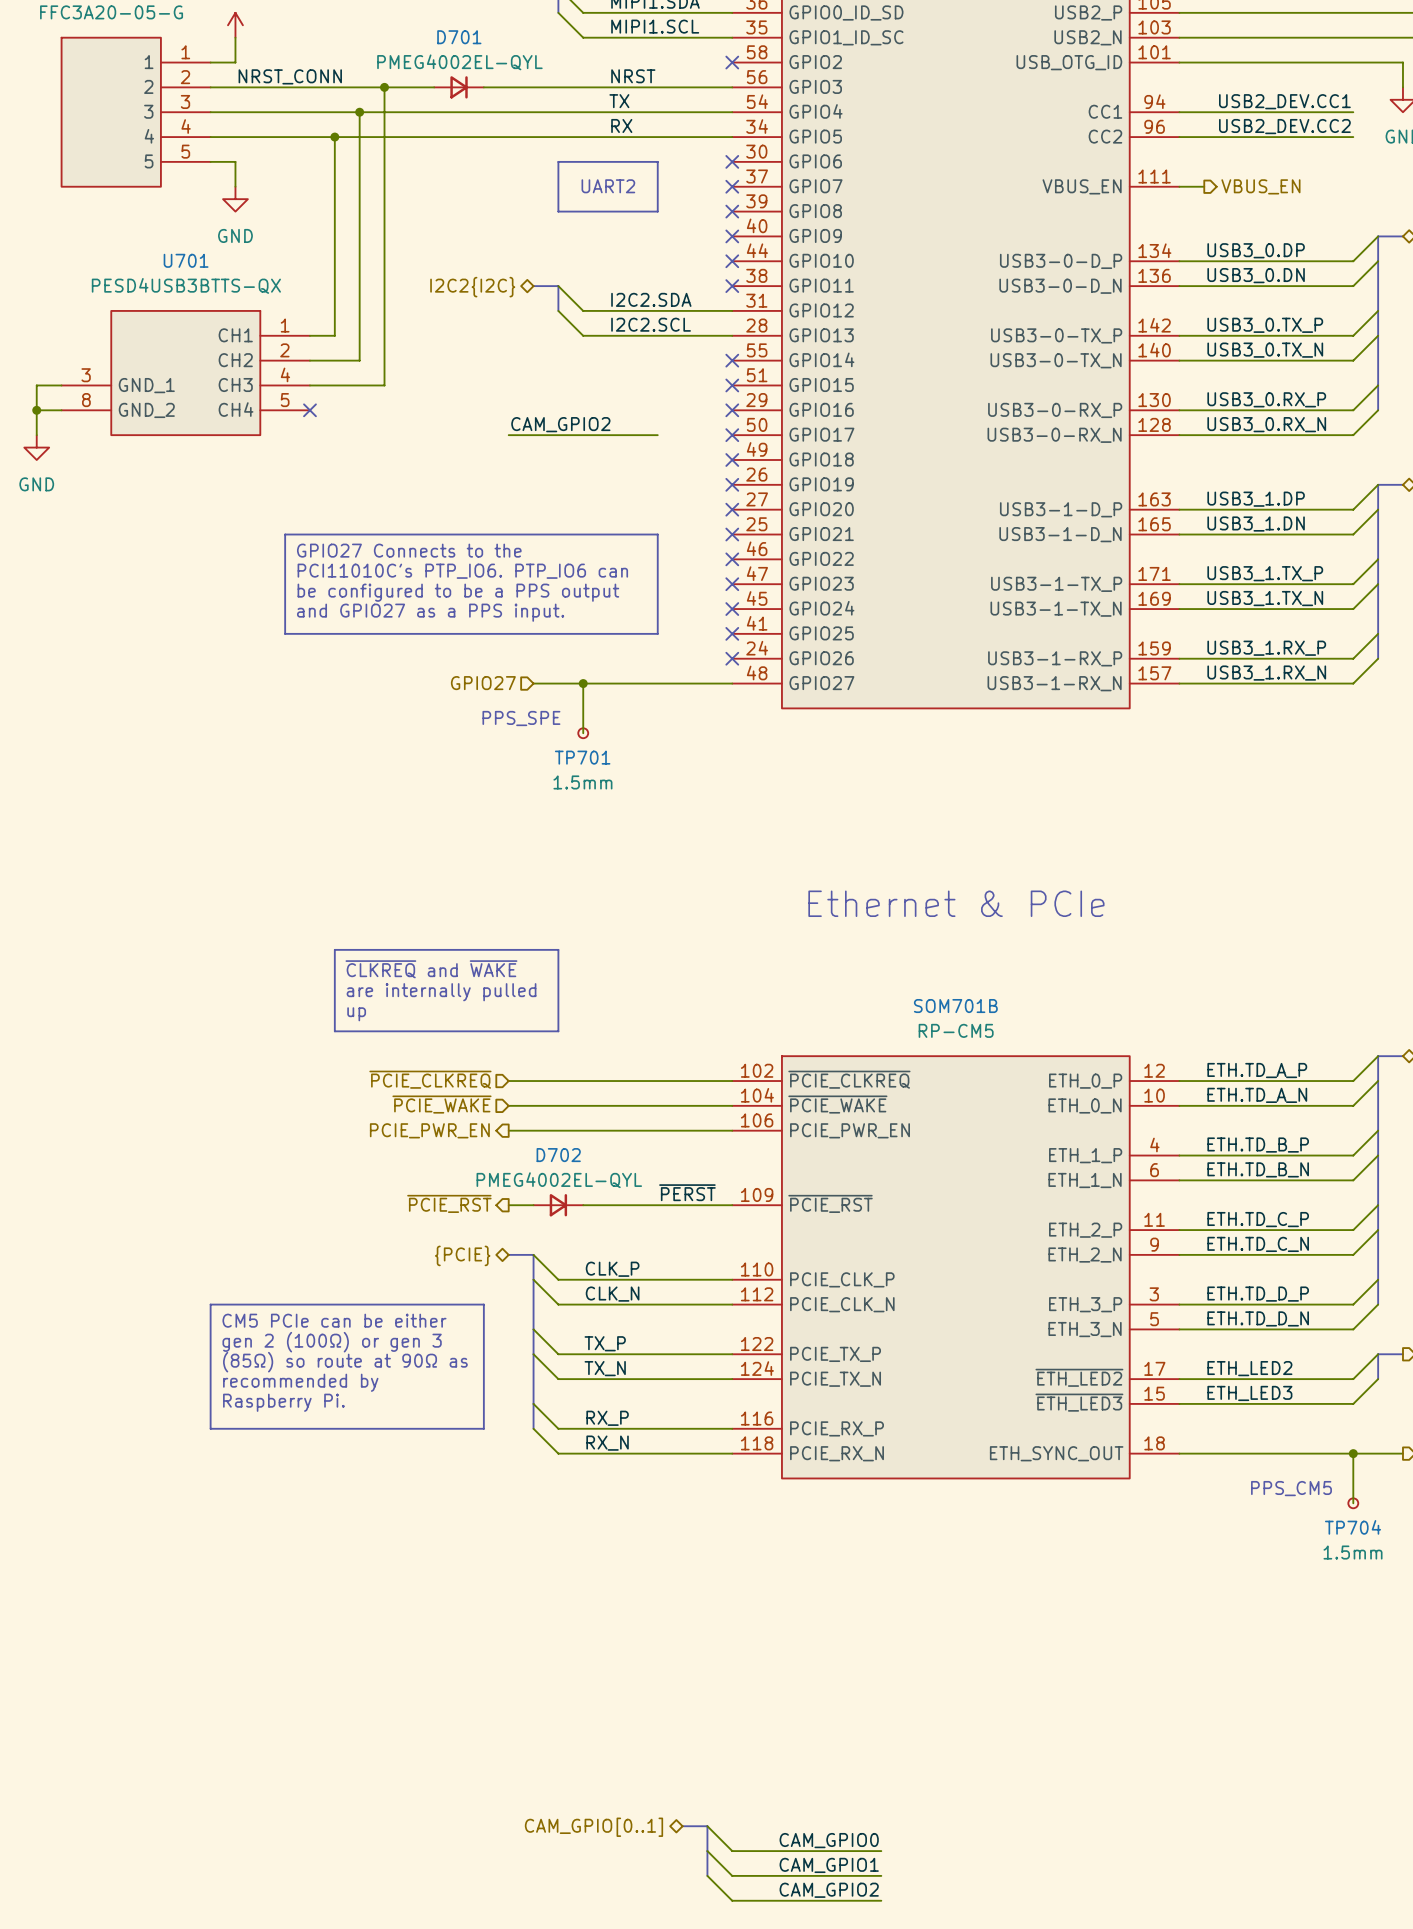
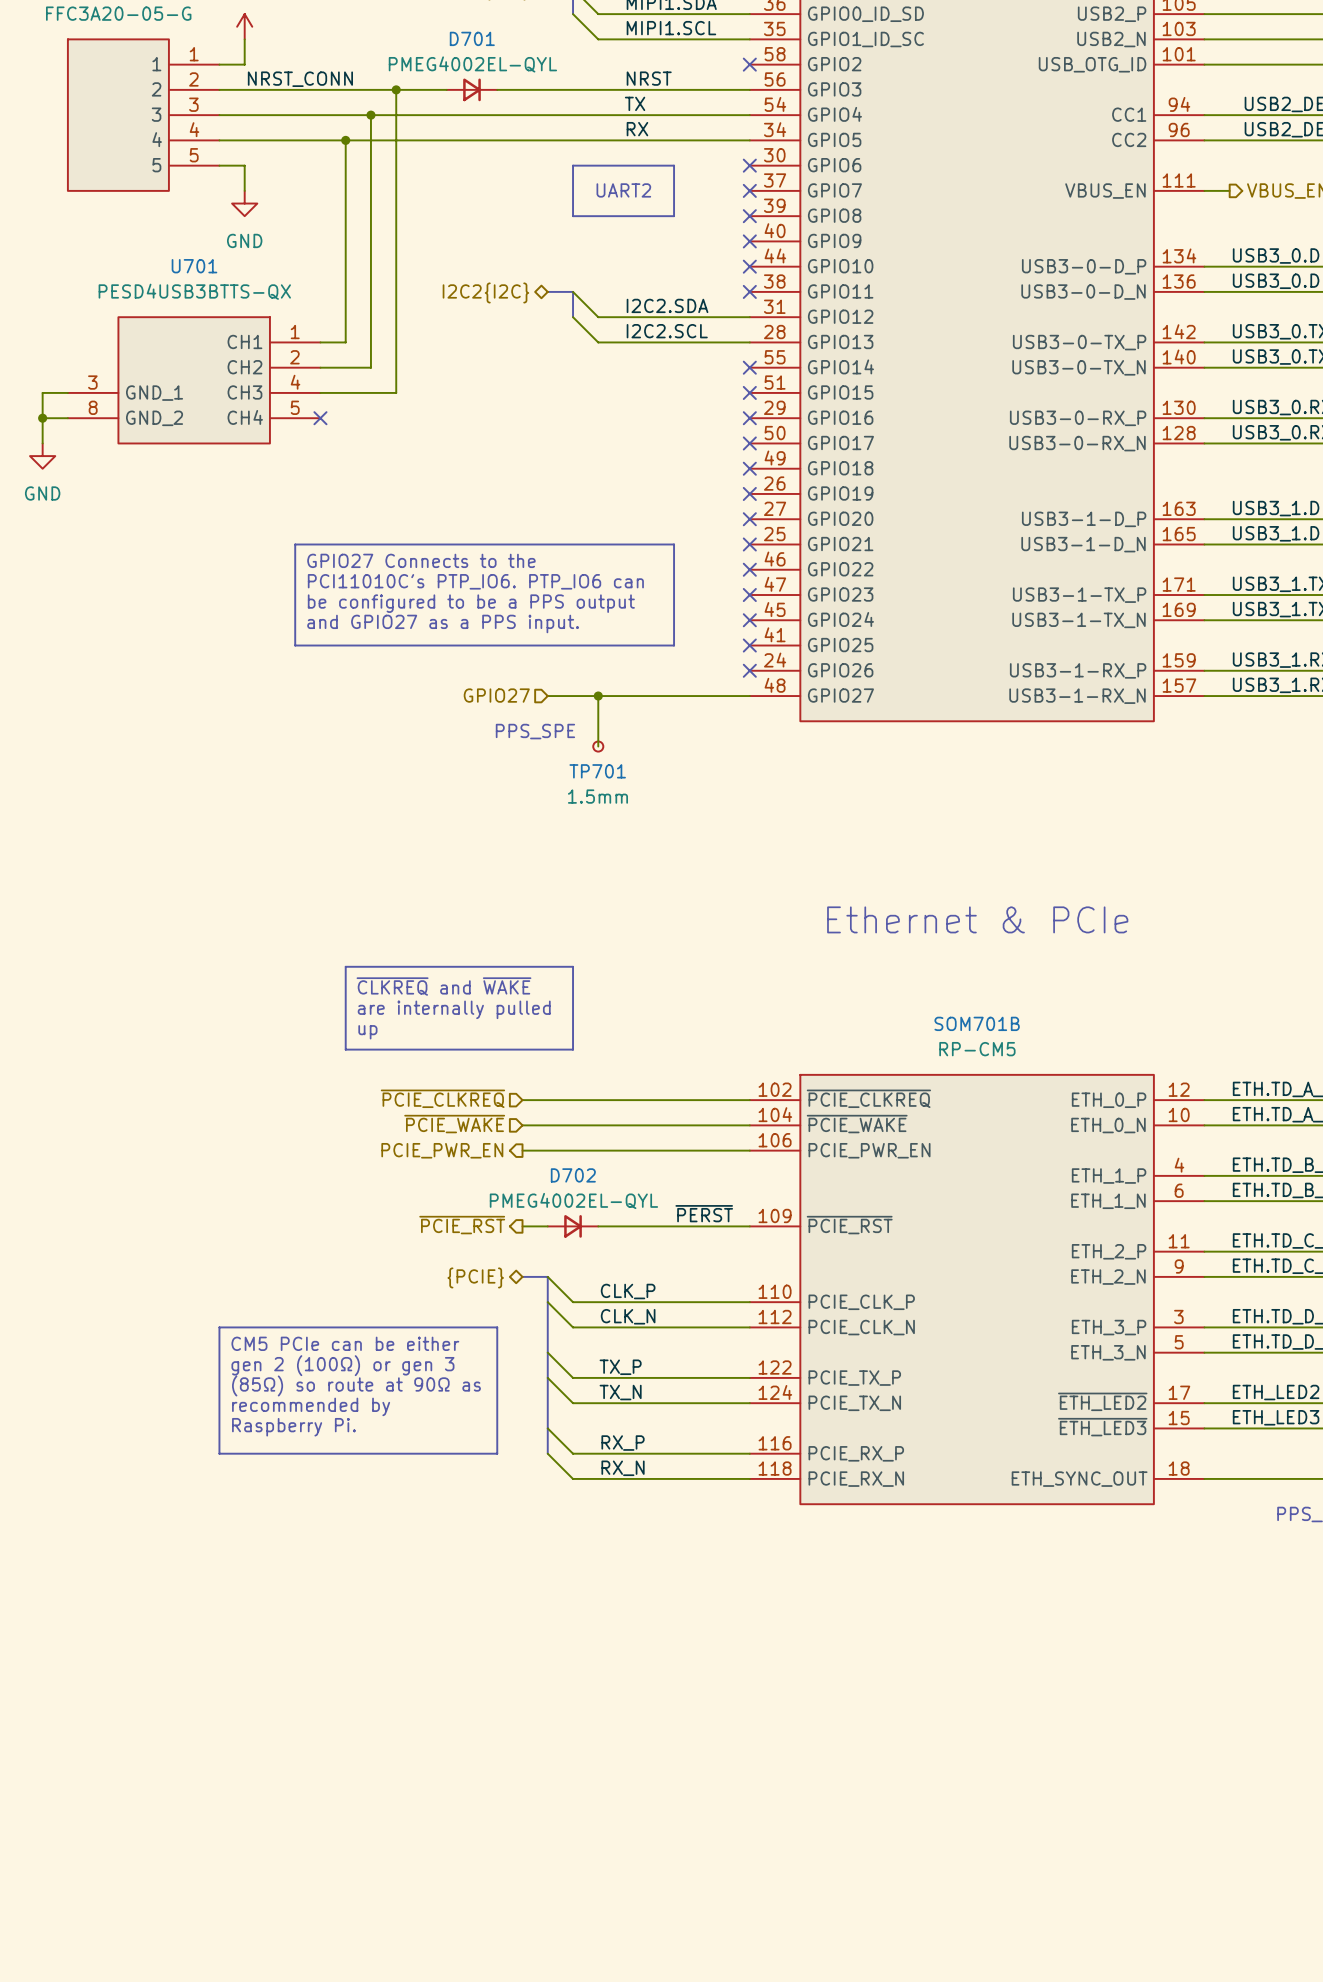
label: CAM_GPIO2 (560, 424) -> none
wire: (508, 435) (657, 435) -> none
bus: (682, 1826) (707, 1826) (707, 1875) -> none
wire: (707, 1826) (732, 1851) (881, 1851) -> none
hierarchical label: CAM_GPIO[0..1] (593, 1827) -> none
label: CAM_GPIO0 (829, 1840) -> none
wire: (707, 1851) (732, 1875) (881, 1875) -> none
label: CAM_GPIO1 (829, 1865) -> none
wire: (707, 1875) (732, 1900) (881, 1900) -> none
label: CAM_GPIO2 (829, 1890) -> none

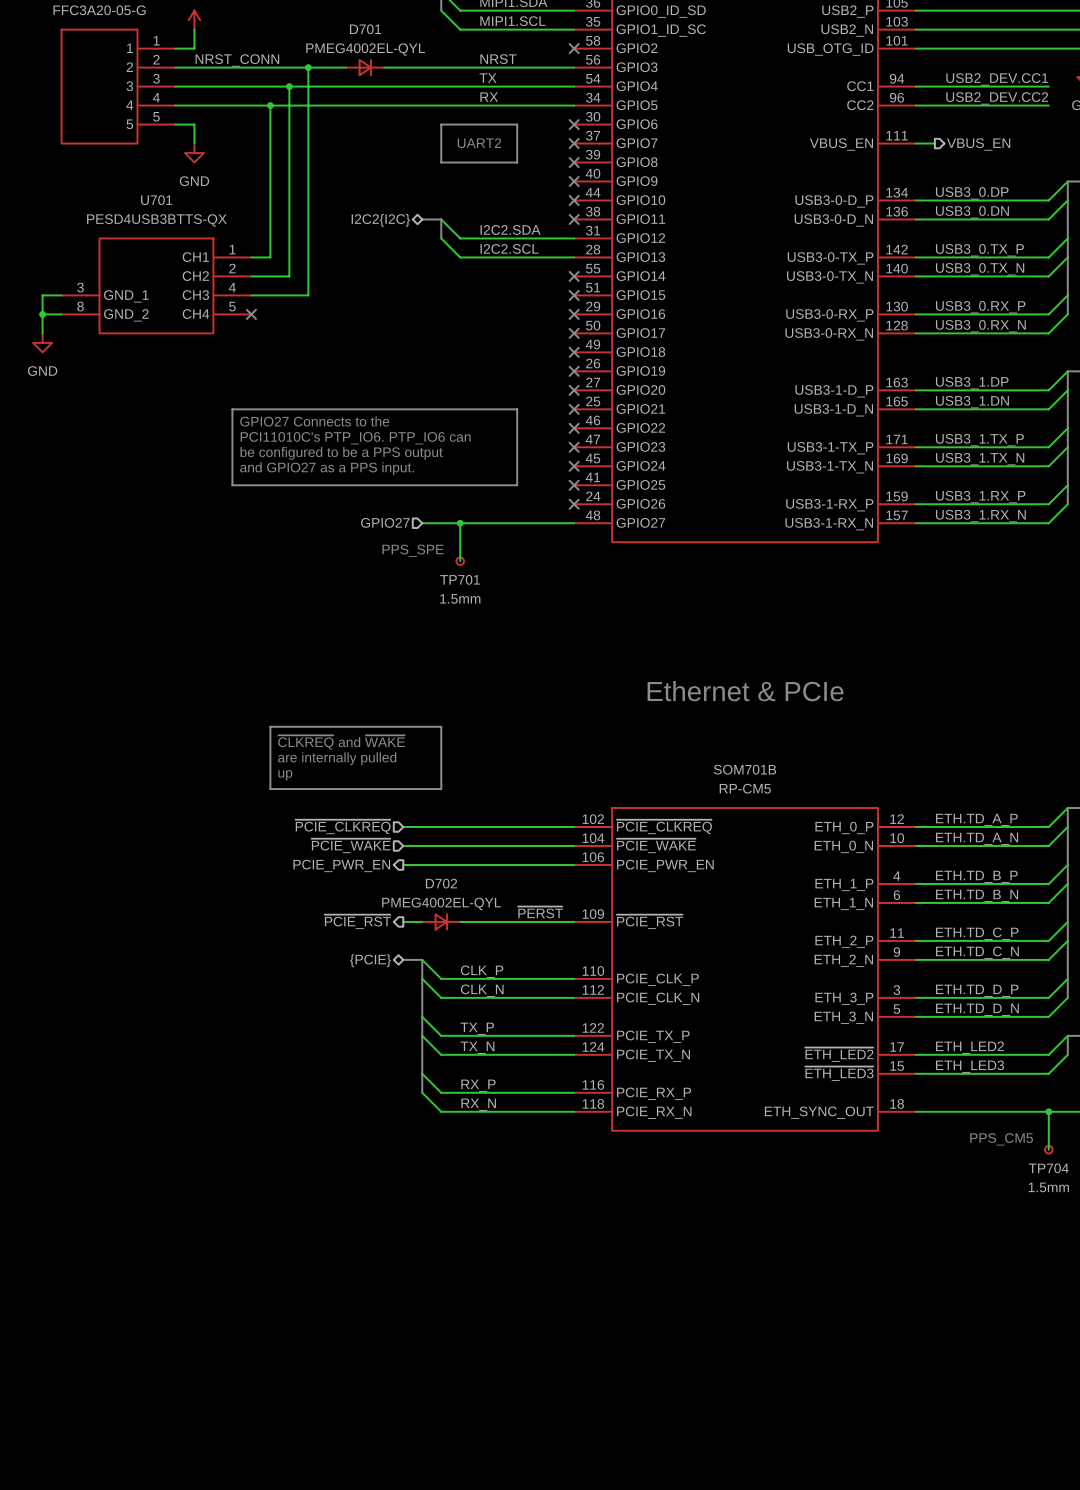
line: (219, 1327) (497, 1327) (497, 1453) (219, 1453) (219, 1327) -> none
text: CM5 PCIe can be either (345, 1343) -> none
text: gen 2 (100Ω) or gen 3 (342, 1365) -> none
text: (85Ω) so route at 90Ω as (356, 1385) -> none
text: recommended by (311, 1406) -> none
text: Raspberry Pi. (293, 1427) -> none

